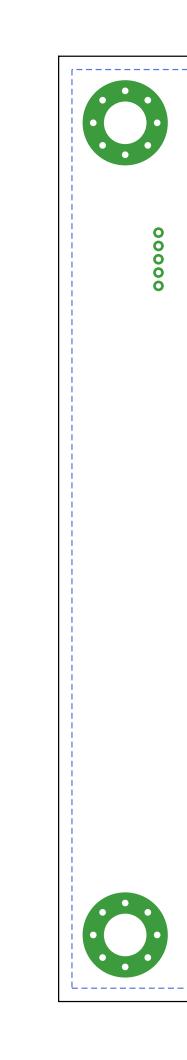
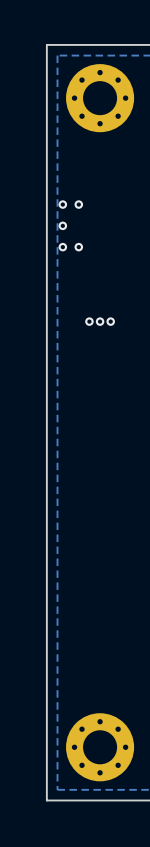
via: (158, 232) -> none
via: (158, 245) -> none
via: none -> (62, 204)
via: none -> (78, 204)
via: (158, 259) -> none
via: (158, 272) -> none
via: none -> (62, 225)
via: (158, 285) -> none
via: none -> (62, 247)
via: none -> (78, 247)
via: none -> (89, 321)
via: none -> (100, 321)
via: none -> (110, 321)

